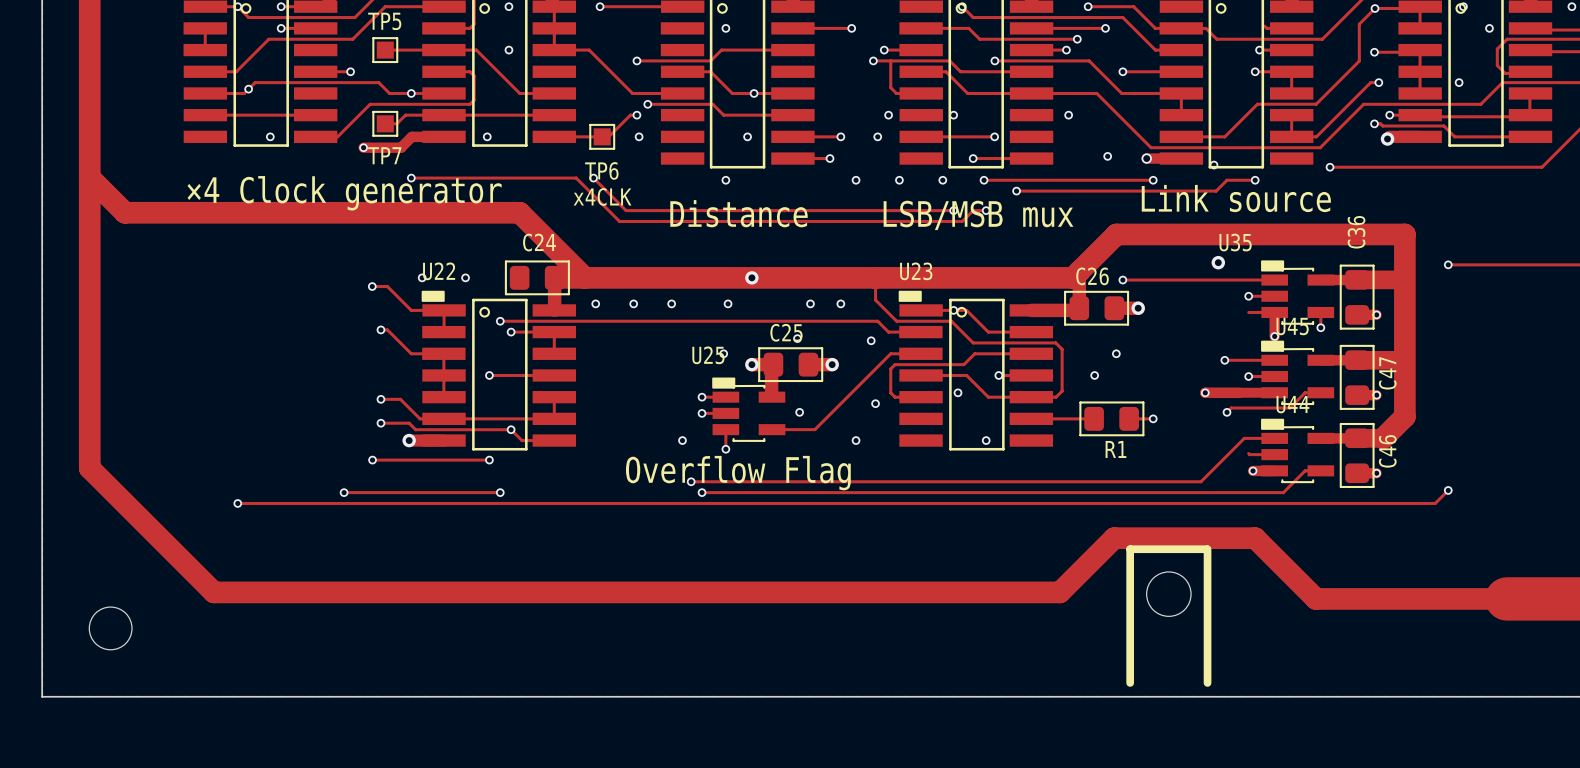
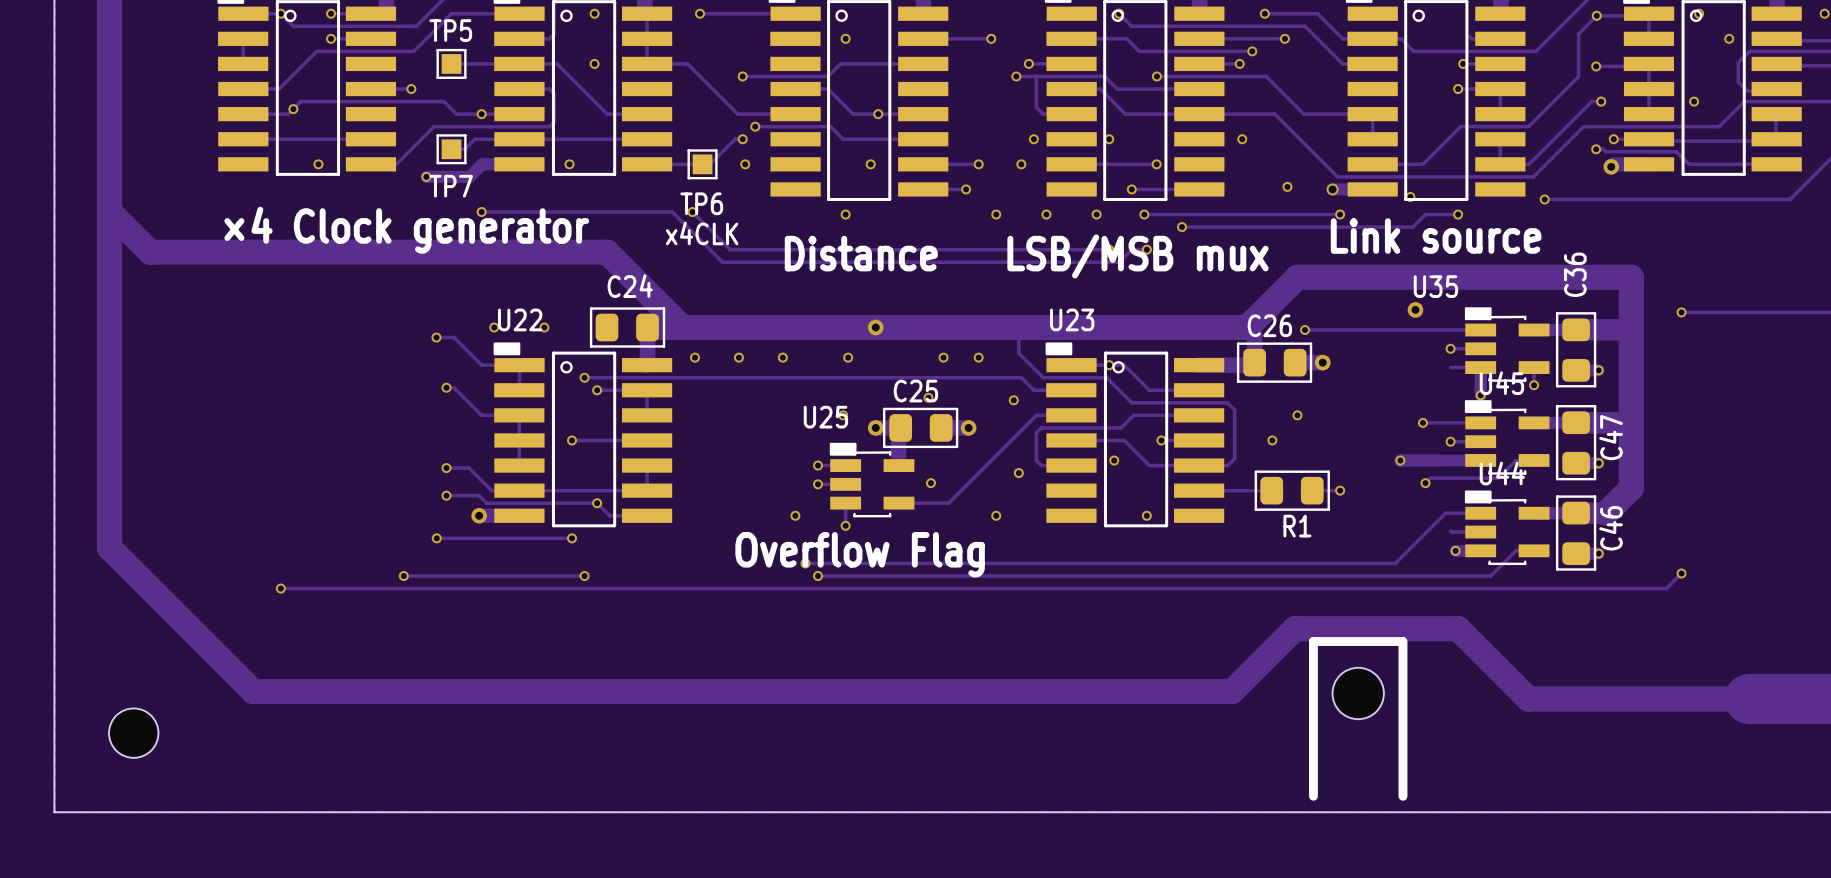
track: (1122, 71) (1181, 71) -> none
via: (1122, 71) -> none

